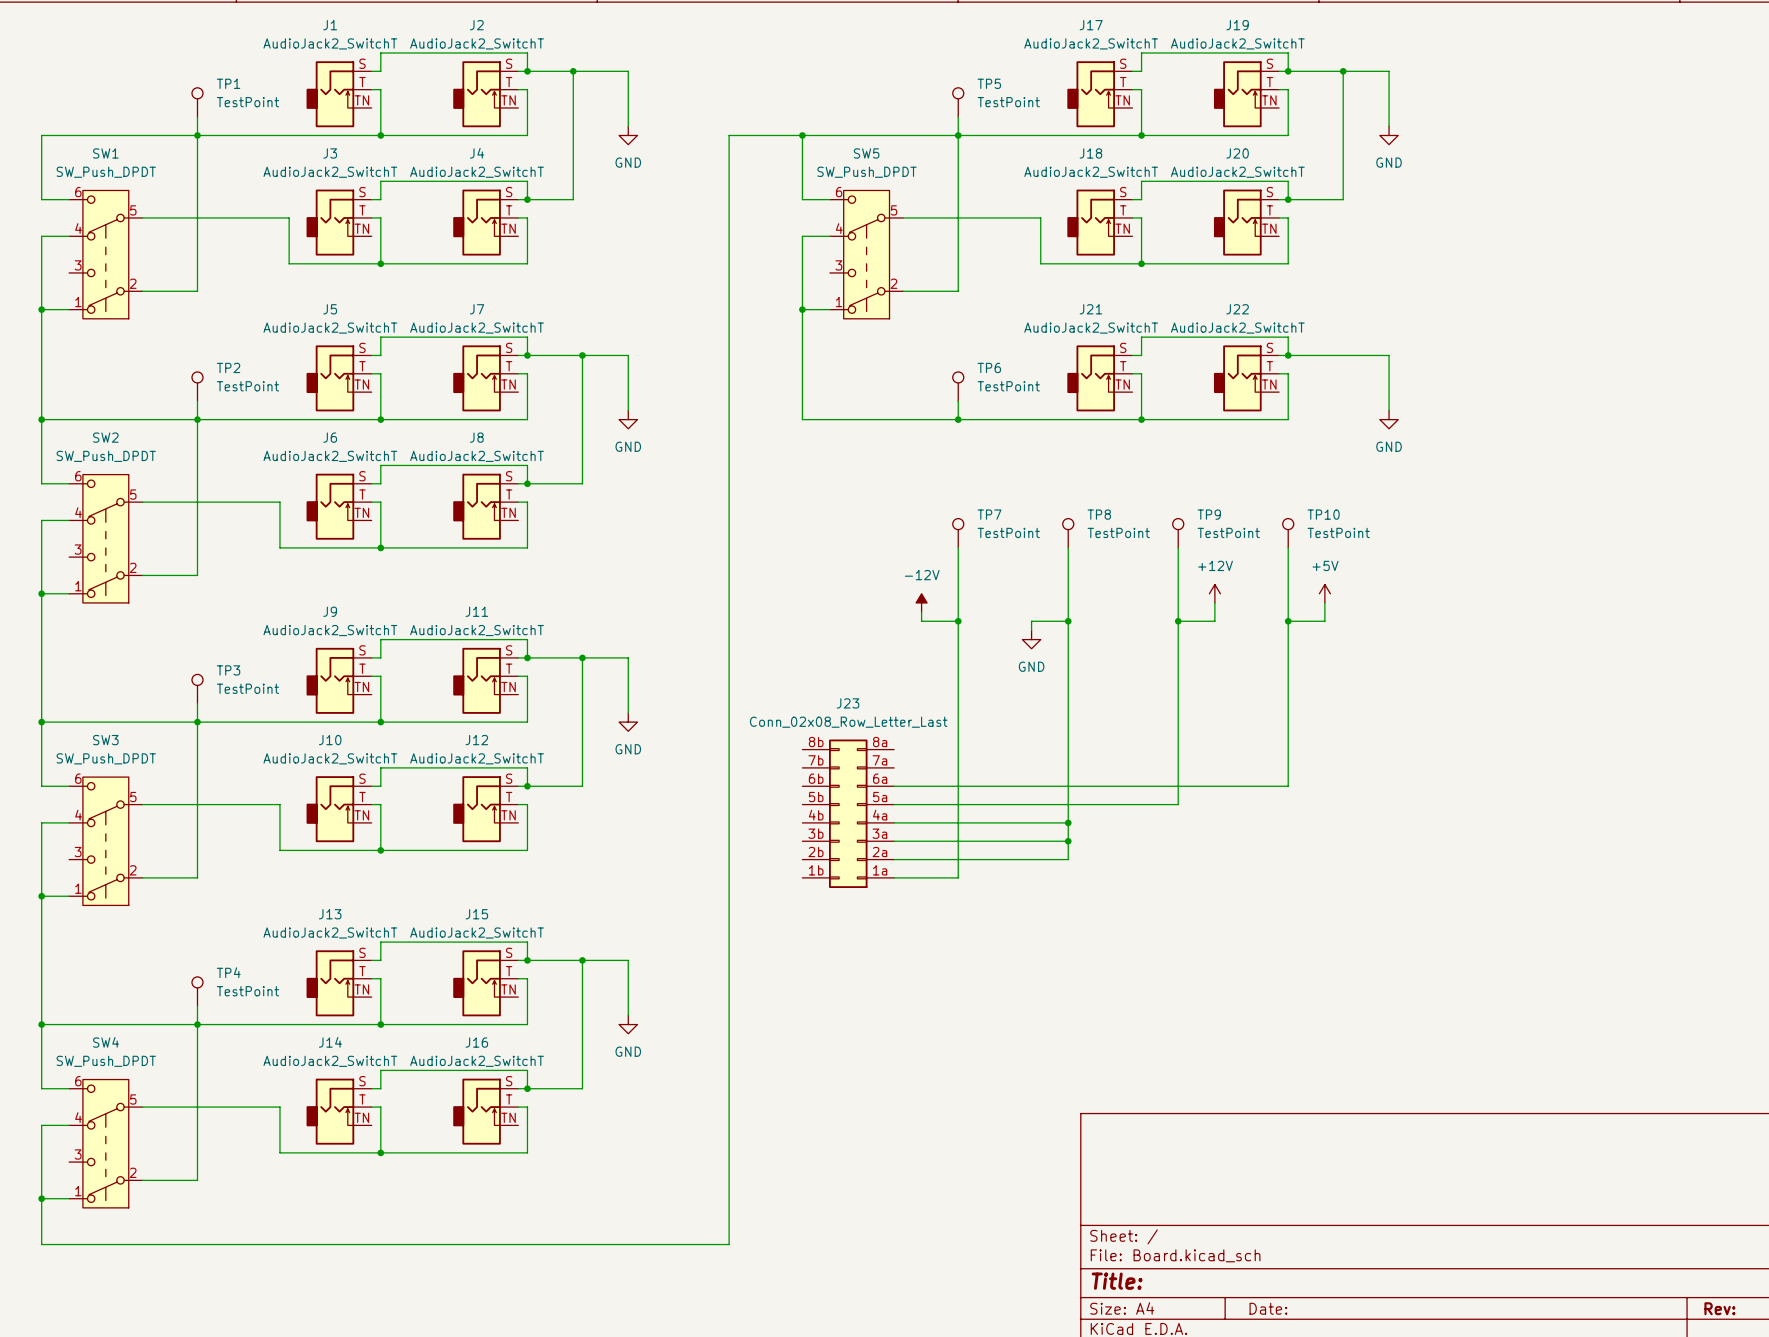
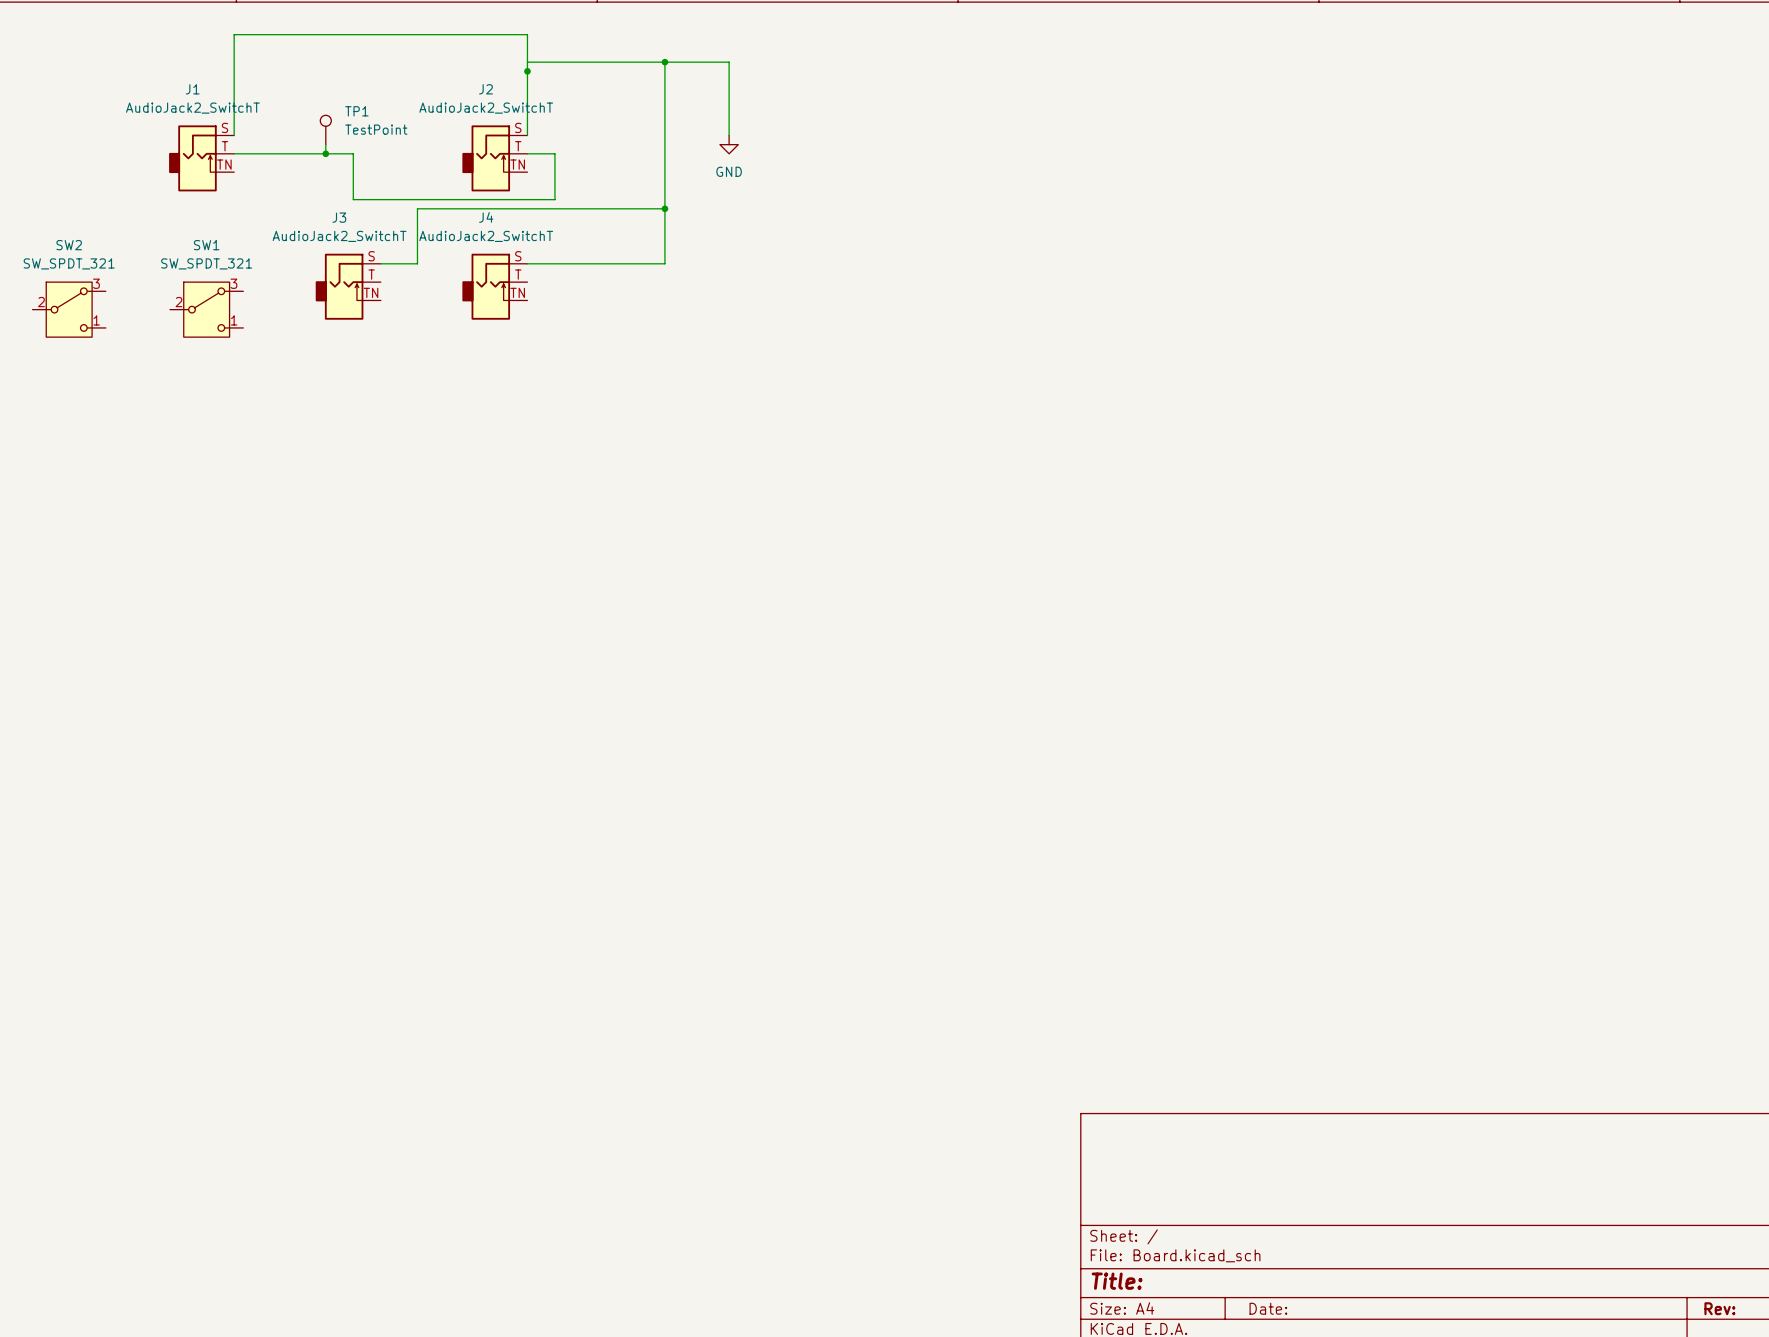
wire: (527, 52) (380, 52) (380, 71) (371, 71) -> (527, 52) (527, 34) (234, 34) (234, 135)
wire: none -> (527, 62) (729, 62) (729, 135)
wire: none -> (664, 62) (664, 263) (527, 263)
junction: none -> (664, 62)
wire: (518, 71) (628, 71) (628, 126) -> none
wire: (573, 71) (573, 199) (554, 199) -> (527, 153) (554, 153) (554, 199)
junction: (573, 71) -> none
wire: (1132, 71) (1141, 71) (1141, 52) (1288, 52) (1288, 71) -> none
wire: (1279, 71) (1389, 71) (1389, 126) -> none
junction: (1288, 71) -> none
wire: (1343, 71) (1343, 199) (1279, 199) -> none
junction: (1343, 71) -> none
wire: (371, 89) (380, 89) (380, 135) -> none
wire: (518, 89) (527, 89) -> (527, 71) (527, 89)
wire: (1132, 89) (1141, 89) (1141, 135) -> none
wire: (1279, 89) (1288, 89) (1288, 135) (729, 135) (729, 1244) (41, 1244) (41, 1125) (69, 1125) -> none
J1 position: (339, 94) -> (201, 158)
J2 position: (485, 94) -> (494, 158)
J17: AudioJack2_SwitchT (1099, 94) -> none
J19: AudioJack2_SwitchT (1246, 94) -> none
TP1 position: (197, 102) -> (325, 129)
TP5: TestPoint (958, 102) -> none
wire: (197, 117) (197, 291) (142, 291) -> none
wire: (958, 117) (958, 291) (903, 291) -> none
junction: (197, 135) -> none
junction: (380, 135) -> none
wire: (527, 135) (41, 135) (41, 199) (69, 199) -> none
power symbol position: GND (628, 135) -> GND (729, 144)
wire: (802, 135) (802, 199) (829, 199) -> none
junction: (802, 135) -> none
junction: (958, 135) -> none
junction: (1141, 135) -> none
power symbol: GND (1389, 135) -> none
wire: none -> (325, 144) (325, 153)
SW1 name position: SW1 (105, 153) -> SW1 (206, 245)
wire: none -> (234, 153) (353, 153) (353, 199) (371, 199)
junction: none -> (325, 153)
SW1 value: SW_Push_DPDT (106, 172) -> SW_SPDT_321 (206, 263)
SW1 symbol: [69, 190, 143, 319] -> [169, 282, 244, 338]
wire: (380, 199) (380, 181) (527, 181) (527, 199) -> (380, 199) (518, 199)
junction: (527, 199) -> none
wire: (1132, 199) (1141, 199) (1141, 181) (1288, 181) (1288, 199) -> none
junction: (1288, 199) -> none
junction: none -> (664, 208)
wire: (142, 217) (289, 217) (289, 263) (380, 263) (380, 217) (371, 217) -> none
wire: (518, 217) (527, 217) (527, 263) (417, 263) -> (664, 208) (417, 208) (417, 263)
wire: (903, 217) (1040, 217) (1040, 263) (1288, 263) (1288, 217) (1279, 217) -> none
wire: (1132, 217) (1141, 217) (1141, 263) -> none
J3 position: (339, 222) -> (348, 286)
J4 position: (485, 222) -> (494, 286)
J18: AudioJack2_SwitchT (1099, 222) -> none
J20: AudioJack2_SwitchT (1246, 222) -> none
wire: (69, 236) (41, 236) (41, 483) (69, 483) -> none
wire: (829, 236) (802, 236) (802, 419) (1288, 419) (1288, 373) (1279, 373) -> none
SW5: SW_Push_DPDT (866, 254) -> none
junction: (380, 263) -> none
junction: (1141, 263) -> none
junction: (41, 309) -> none
wire: (802, 309) (829, 309) -> none
junction: (802, 309) -> none
wire: (371, 355) (380, 355) (380, 337) (527, 337) (527, 355) -> none
wire: (518, 355) (628, 355) (628, 410) -> none
junction: (527, 355) -> none
wire: (582, 355) (582, 483) (518, 483) -> none
junction: (582, 355) -> none
wire: (1132, 355) (1141, 355) (1141, 337) (1288, 337) (1288, 355) -> none
wire: (1279, 355) (1389, 355) (1389, 410) -> none
junction: (1288, 355) -> none
wire: (371, 373) (380, 373) (380, 419) -> none
wire: (518, 373) (527, 373) (527, 419) (41, 419) -> none
wire: (1132, 373) (1141, 373) (1141, 419) -> none
J5: AudioJack2_SwitchT (339, 378) -> none
J7: AudioJack2_SwitchT (485, 378) -> none
J21: AudioJack2_SwitchT (1099, 378) -> none
J22: AudioJack2_SwitchT (1246, 378) -> none
TP2: TestPoint (197, 386) -> none
TP6: TestPoint (958, 386) -> none
wire: (197, 401) (197, 575) (142, 575) -> none
wire: (958, 401) (958, 419) -> none
junction: (41, 419) -> none
junction: (197, 419) -> none
junction: (380, 419) -> none
power symbol: GND (628, 419) -> none
junction: (958, 419) -> none
junction: (1141, 419) -> none
power symbol: GND (1389, 419) -> none
SW2 name position: SW2 (105, 437) -> SW2 (69, 245)
SW2 value: SW_Push_DPDT (106, 456) -> SW_SPDT_321 (69, 263)
SW2 symbol: [69, 474, 143, 603] -> [32, 282, 106, 338]
wire: (371, 483) (380, 483) (380, 465) (527, 465) (527, 483) -> none
junction: (527, 483) -> none
wire: (142, 502) (279, 502) (279, 547) (527, 547) (527, 502) (518, 502) -> none
wire: (371, 502) (380, 502) (380, 547) -> none
J6: AudioJack2_SwitchT (339, 506) -> none
J8: AudioJack2_SwitchT (485, 506) -> none
wire: (69, 520) (41, 520) (41, 786) (69, 786) -> none
TP7: TestPoint (958, 533) -> none
TP8: TestPoint (1068, 533) -> none
TP9: TestPoint (1178, 533) -> none
TP10: TestPoint (1288, 533) -> none
junction: (380, 547) -> none
wire: (958, 547) (958, 877) (894, 877) -> none
wire: (1068, 547) (1068, 859) (894, 859) -> none
wire: (1178, 547) (1178, 804) (894, 804) -> none
wire: (1288, 547) (1288, 786) (894, 786) -> none
wire: (41, 593) (69, 593) -> none
junction: (41, 593) -> none
power symbol: +12V (1214, 593) -> none
power symbol: +5V (1324, 593) -> none
power symbol: -12V (921, 602) -> none
wire: (1214, 602) (1214, 621) (1178, 621) -> none
wire: (1324, 602) (1324, 621) (1288, 621) -> none
wire: (921, 612) (921, 621) (958, 621) -> none
junction: (958, 621) -> none
wire: (1068, 621) (1031, 621) (1031, 630) -> none
junction: (1068, 621) -> none
junction: (1178, 621) -> none
junction: (1288, 621) -> none
power symbol: GND (1031, 639) -> none
wire: (371, 657) (380, 657) (380, 639) (527, 639) (527, 657) -> none
wire: (518, 657) (628, 657) (628, 712) -> none
junction: (527, 657) -> none
wire: (582, 657) (582, 786) (518, 786) -> none
junction: (582, 657) -> none
wire: (371, 676) (380, 676) (380, 722) -> none
wire: (518, 676) (527, 676) (527, 722) (41, 722) -> none
J9: AudioJack2_SwitchT (339, 680) -> none
J11: AudioJack2_SwitchT (485, 680) -> none
TP3: TestPoint (197, 689) -> none
wire: (197, 703) (197, 877) (142, 877) -> none
junction: (41, 722) -> none
junction: (197, 722) -> none
junction: (380, 722) -> none
power symbol: GND (628, 722) -> none
wire: (371, 786) (380, 786) (380, 767) (527, 767) (527, 786) -> none
junction: (527, 786) -> none
wire: (142, 804) (279, 804) (279, 850) (527, 850) (527, 804) (518, 804) -> none
wire: (371, 804) (380, 804) (380, 850) -> none
J10: AudioJack2_SwitchT (339, 809) -> none
J12: AudioJack2_SwitchT (485, 809) -> none
J23: Conn_02x08_Row_Letter_Last (848, 813) -> none
wire: (69, 822) (41, 822) (41, 1088) (69, 1088) -> none
wire: (894, 822) (1068, 822) -> none
junction: (1068, 822) -> none
SW3: SW_Push_DPDT (105, 841) -> none
wire: (894, 841) (1068, 841) -> none
junction: (1068, 841) -> none
junction: (380, 850) -> none
wire: (41, 896) (69, 896) -> none
junction: (41, 896) -> none
wire: (371, 960) (380, 960) (380, 942) (527, 942) (527, 960) -> none
wire: (518, 960) (628, 960) (628, 1015) -> none
junction: (527, 960) -> none
wire: (582, 960) (582, 1088) (518, 1088) -> none
junction: (582, 960) -> none
wire: (371, 978) (380, 978) (380, 1024) -> none
wire: (518, 978) (527, 978) (527, 1024) (41, 1024) -> none
J13: AudioJack2_SwitchT (339, 983) -> none
J15: AudioJack2_SwitchT (485, 983) -> none
TP4: TestPoint (197, 991) -> none
wire: (197, 1006) (197, 1180) (142, 1180) -> none
junction: (41, 1024) -> none
junction: (197, 1024) -> none
junction: (380, 1024) -> none
power symbol: GND (628, 1024) -> none
wire: (371, 1088) (380, 1088) (380, 1070) (527, 1070) (527, 1088) -> none
junction: (527, 1088) -> none
wire: (142, 1107) (279, 1107) (279, 1152) (527, 1152) (527, 1107) (518, 1107) -> none
wire: (371, 1107) (380, 1107) (380, 1152) -> none
J14: AudioJack2_SwitchT (339, 1111) -> none
J16: AudioJack2_SwitchT (485, 1111) -> none
SW4: SW_Push_DPDT (105, 1143) -> none
junction: (380, 1152) -> none
wire: (41, 1198) (69, 1198) -> none
junction: (41, 1198) -> none

